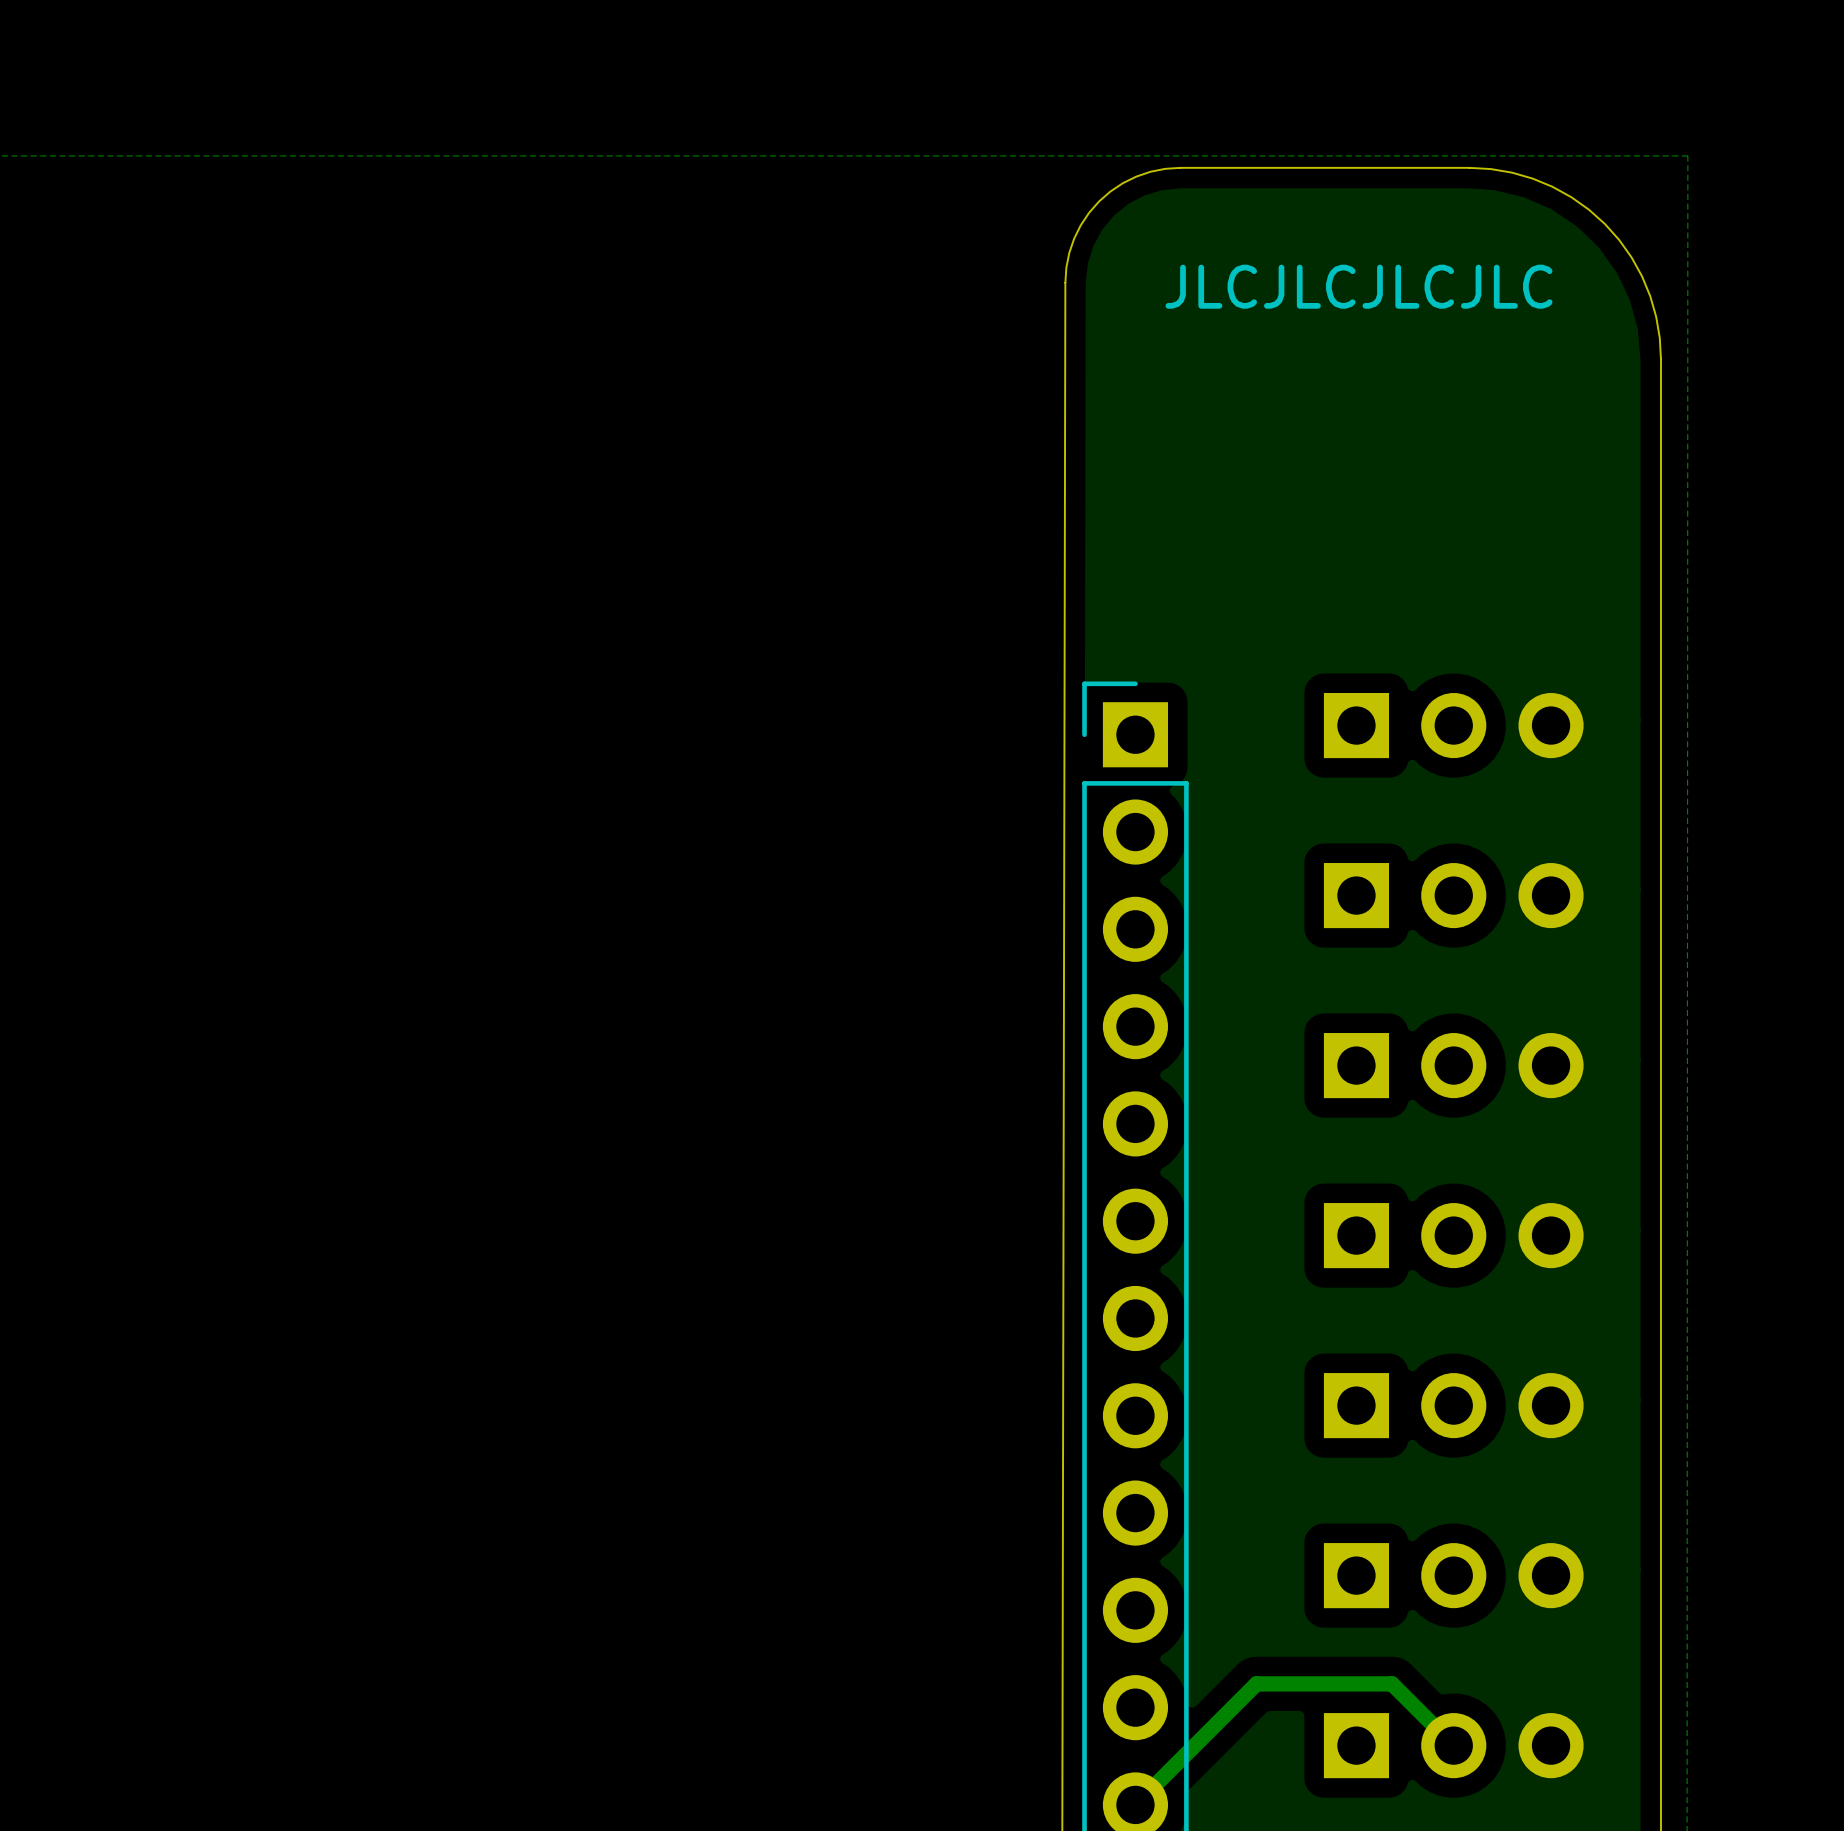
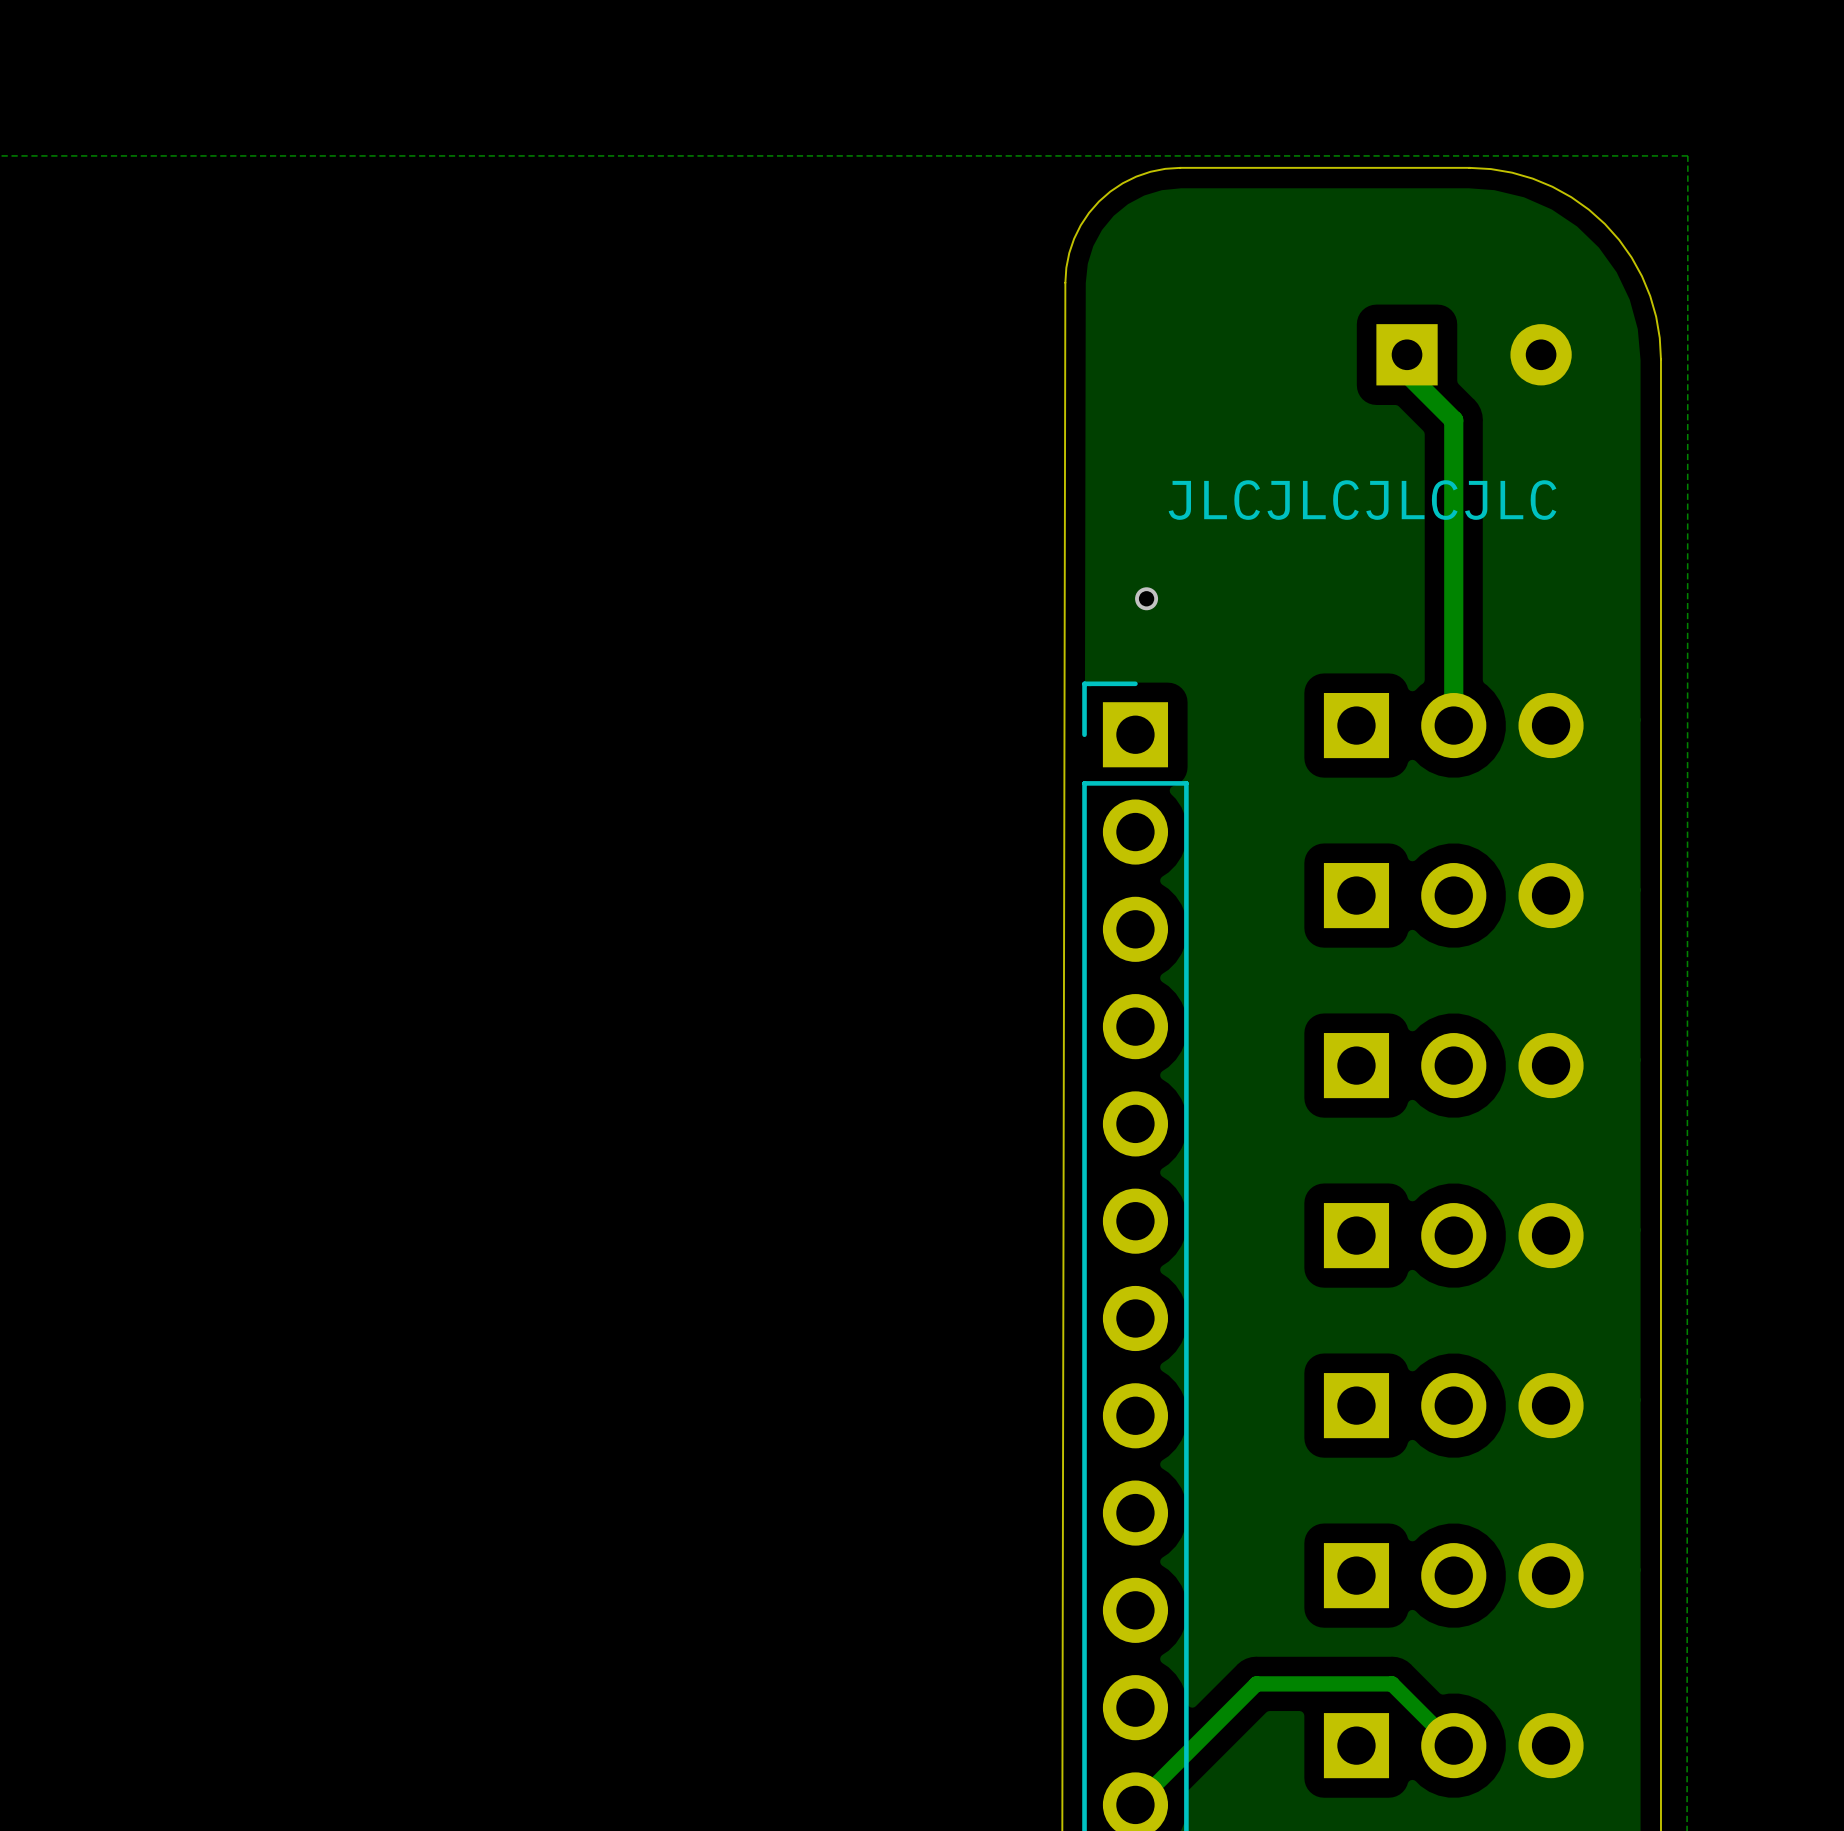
text position: JLCJLCJLCJLC (1359, 286) -> JLCJLCJLCJLC (1362, 500)
track: none -> (1388, 354) (1453, 420) (1453, 725)
part: none -> (1474, 354)
via: none -> (1146, 598)

